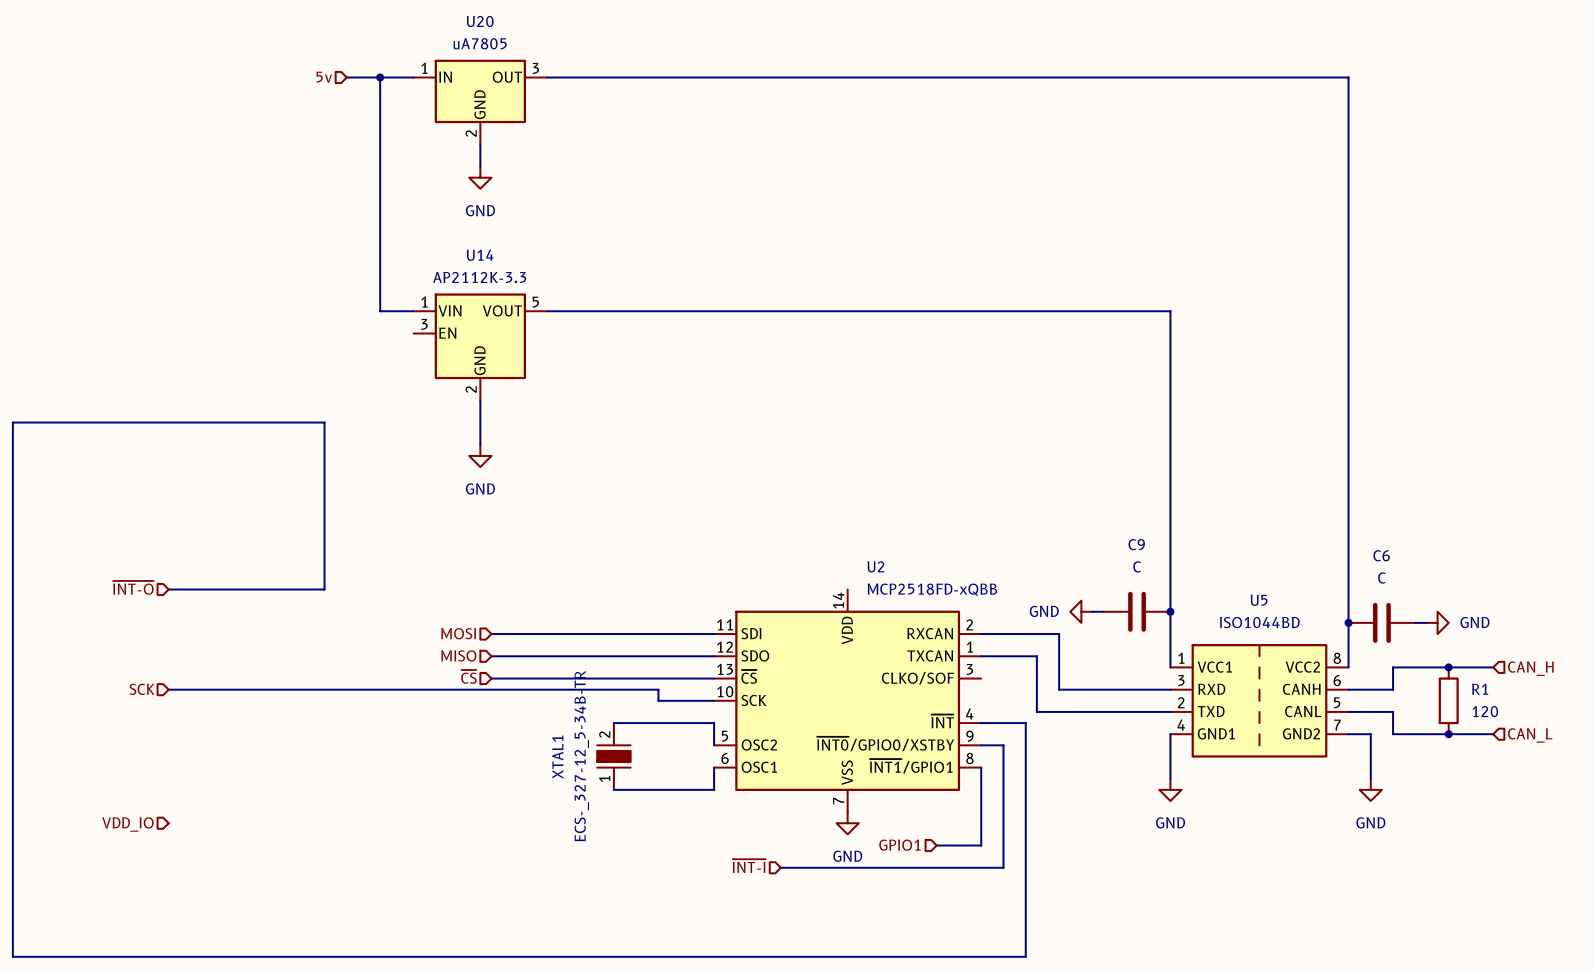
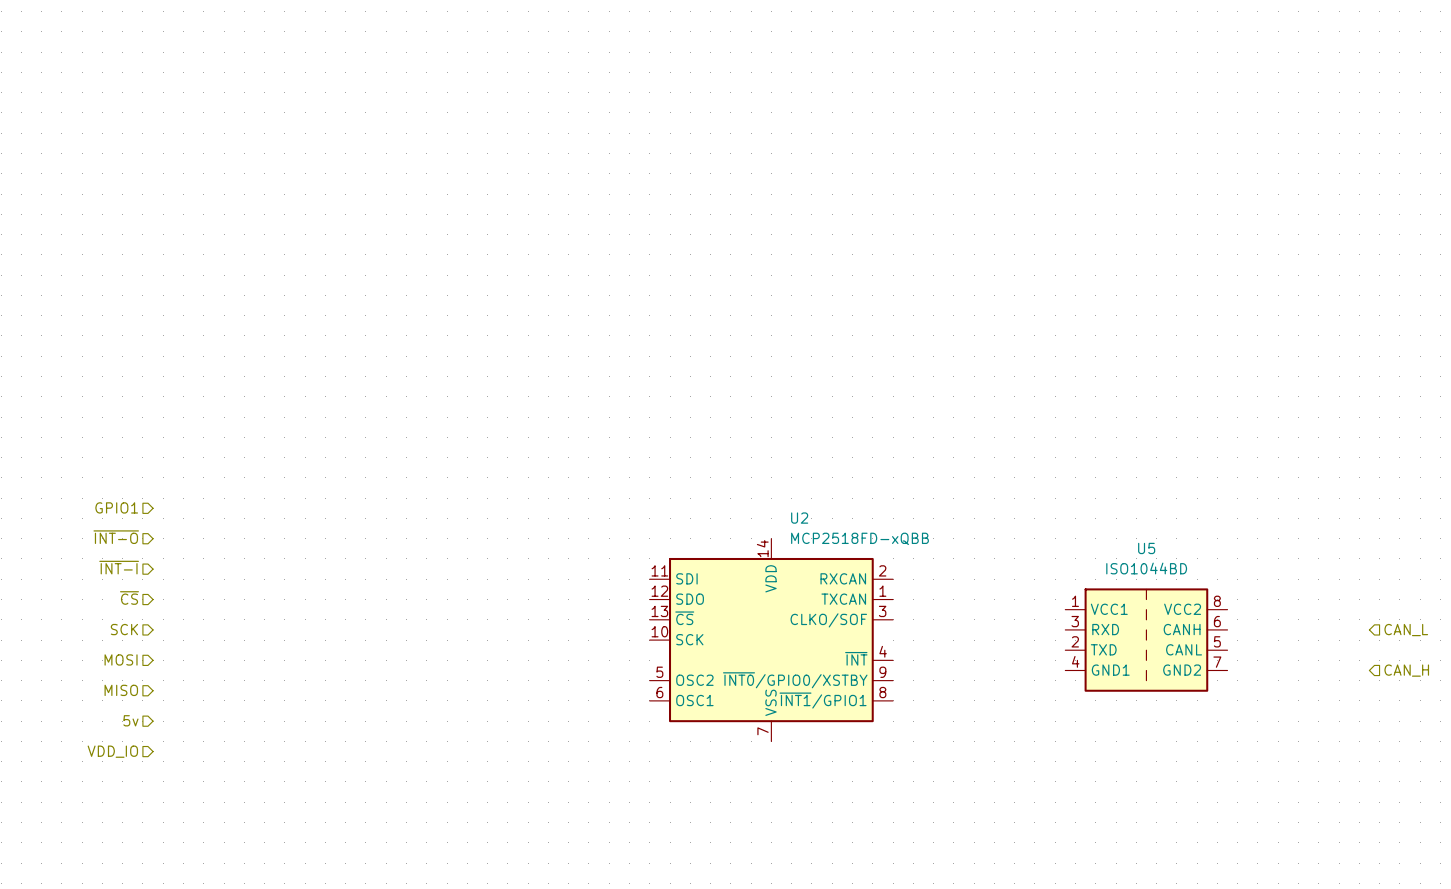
hierarchical label: 5v (324, 77) -> none
wire: (346, 77) (413, 77) -> none
wire: (380, 77) (380, 311) (413, 311) -> none
junction: (380, 77) -> none
wire: (547, 77) (1348, 77) (1348, 667) -> none
U20: uA7805 (480, 101) -> none
wire: (480, 144) (480, 166) -> none
power symbol: GND (480, 177) -> none
wire: (547, 311) (1170, 311) (1170, 667) -> none
U14: AP2112K-3.3 (480, 346) -> none
wire: (480, 400) (480, 444) -> none
power symbol: GND (480, 455) -> none
hierarchical label: none -> GPIO1 (116, 507)
wire: (168, 589) (324, 589) (324, 422) (12, 422) (12, 956) (1025, 956) (1025, 723) (981, 723) -> none
power symbol: GND (1081, 611) -> none
wire: (1092, 611) (1103, 611) -> none
C9: C (1137, 611) -> none
junction: (1170, 611) -> none
hierarchical label: none -> ~{INT-I} (119, 567)
junction: (1348, 622) -> none
C6: C (1381, 622) -> none
wire: (1415, 622) (1426, 622) -> none
power symbol: GND (1437, 622) -> none
hierarchical label: MOSI (458, 633) -> none
wire: (491, 634) (714, 634) -> none
wire: (981, 634) (1059, 634) (1059, 689) (1170, 689) -> none
hierarchical label: none -> ~{CS} (129, 597)
hierarchical label: MISO (458, 655) -> none
wire: (491, 656) (714, 656) -> none
wire: (981, 656) (1036, 656) (1036, 711) (1170, 711) -> none
junction: (1448, 667) -> none
wire: (1493, 667) (1393, 667) (1393, 689) (1348, 689) -> none
hierarchical label position: CAN_H (1530, 668) -> CAN_H (1406, 670)
hierarchical label: ~{CS} (468, 676) -> none
wire: (491, 678) (714, 678) -> none
wire: (168, 689) (658, 689) (658, 700) (714, 700) -> none
R1: 120 (1448, 700) -> none
wire: (1348, 711) (1393, 711) (1393, 734) (1493, 734) -> none
hierarchical label: none -> MOSI (121, 659)
wire: (613, 723) (714, 723) (714, 745) -> none
wire: (1170, 734) (1170, 778) -> none
wire: (1348, 734) (1370, 734) (1370, 778) -> none
junction: (1448, 734) -> none
hierarchical label position: CAN_L (1530, 735) -> CAN_L (1406, 630)
wire: (981, 745) (1003, 745) (1003, 867) (780, 867) -> none
hierarchical label: none -> MISO (121, 690)
XTAL1: ECS-_327-12_5-34B-TR (613, 756) -> none
wire: (714, 767) (714, 789) (613, 789) -> none
wire: (981, 767) (981, 845) (936, 845) -> none
hierarchical label: none -> 5v (130, 720)
power symbol: GND (1170, 789) -> none
power symbol: GND (1370, 789) -> none
power symbol: GND (847, 823) -> none
hierarchical label: GPIO1 (900, 845) -> none
hierarchical label: ~{INT-I} (749, 866) -> none

